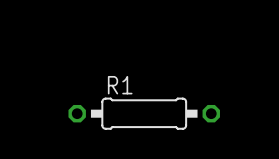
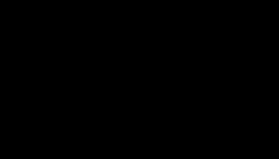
R1: (144, 113) -> none

